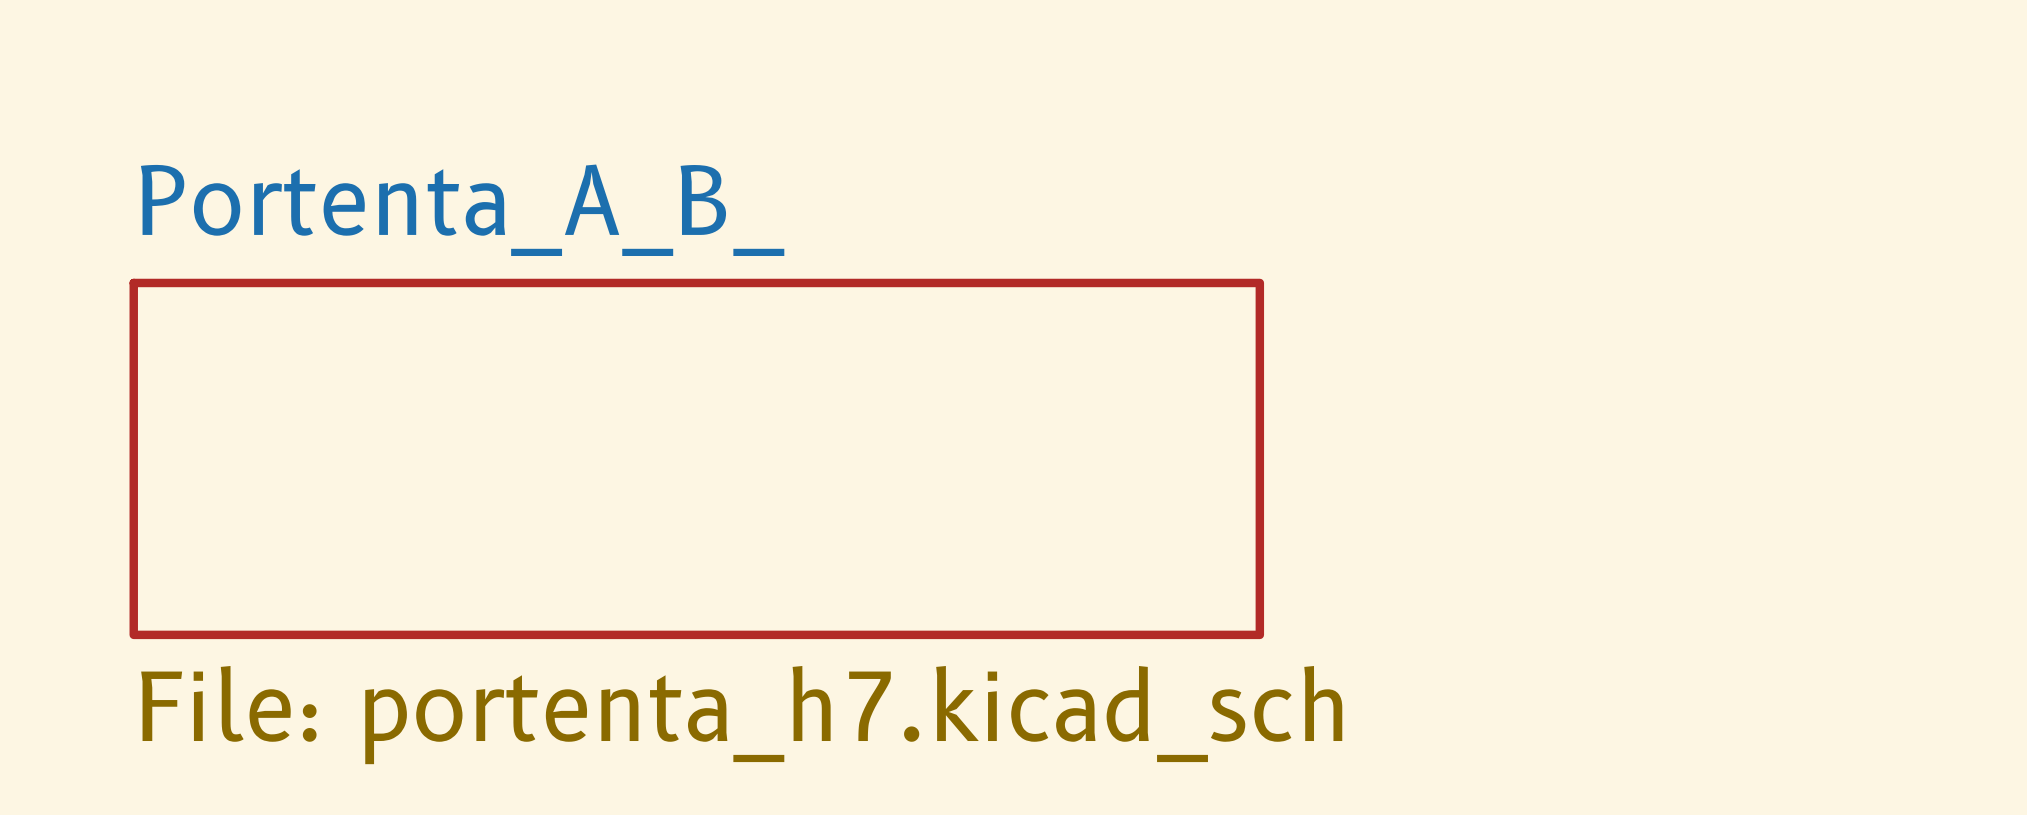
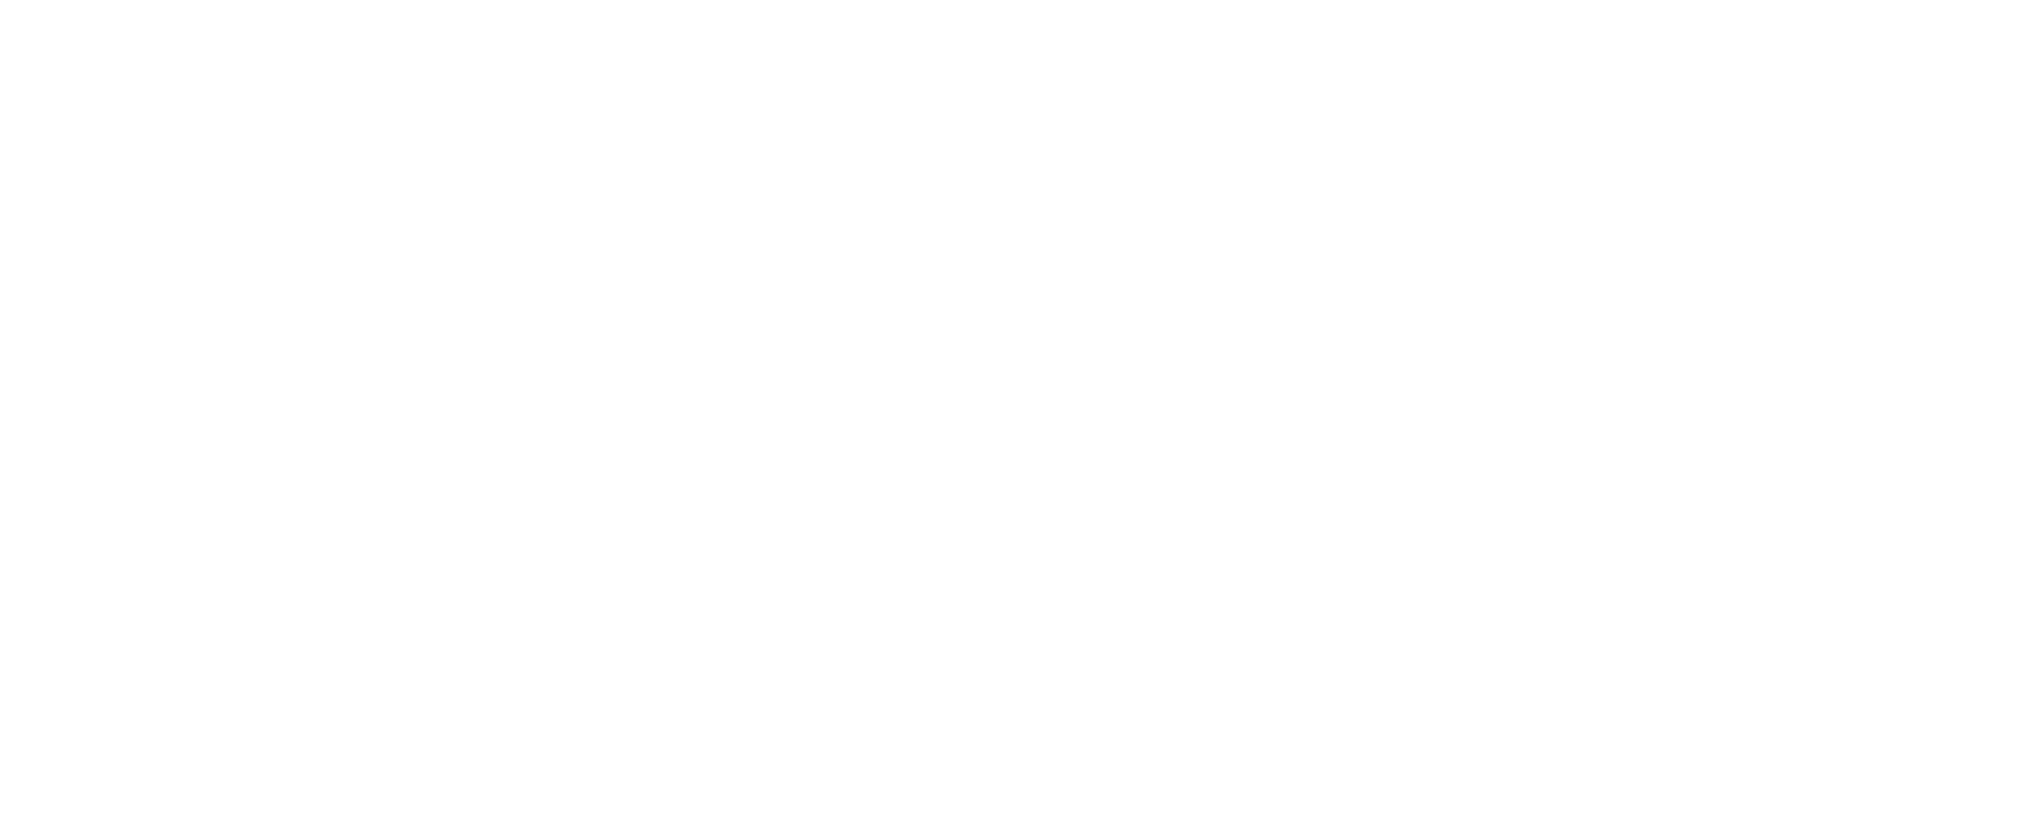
sheet Portenta_A_B_: File: portenta_h7.kicad_sch (696, 458) -> none

